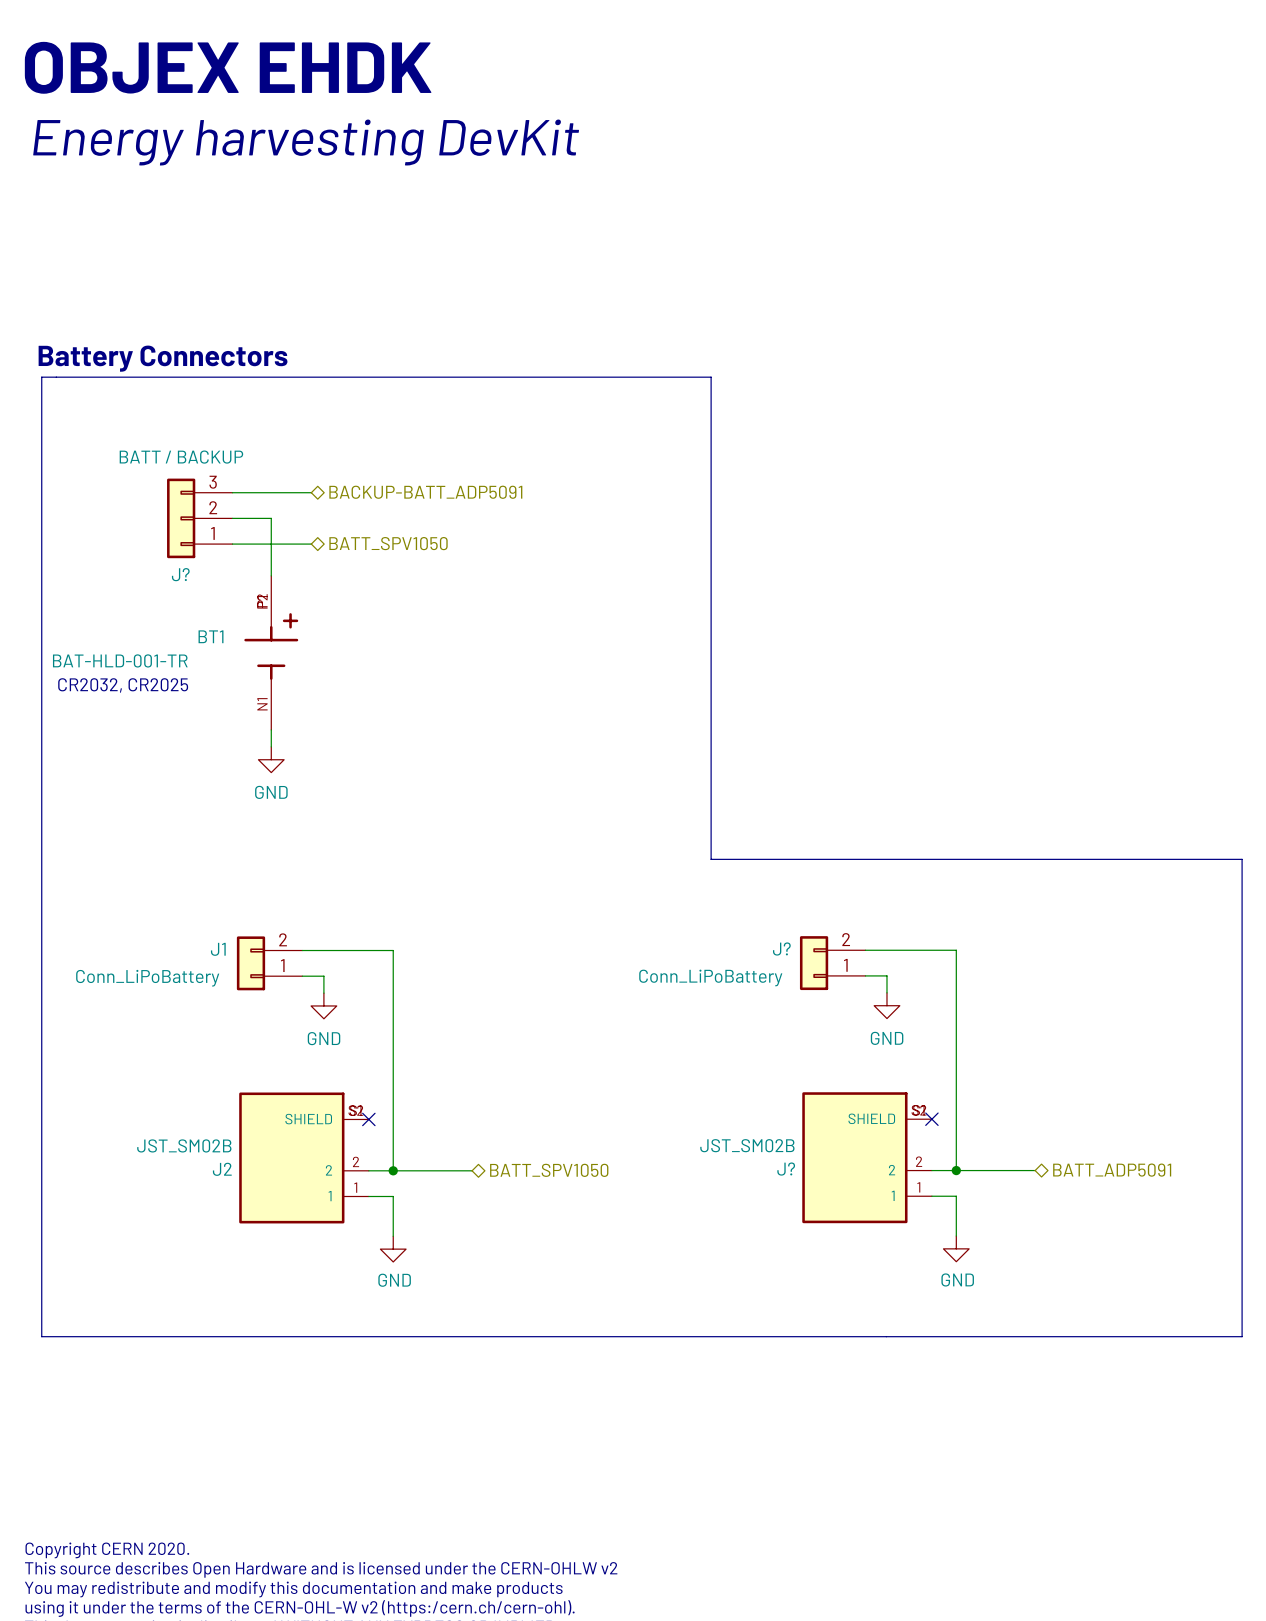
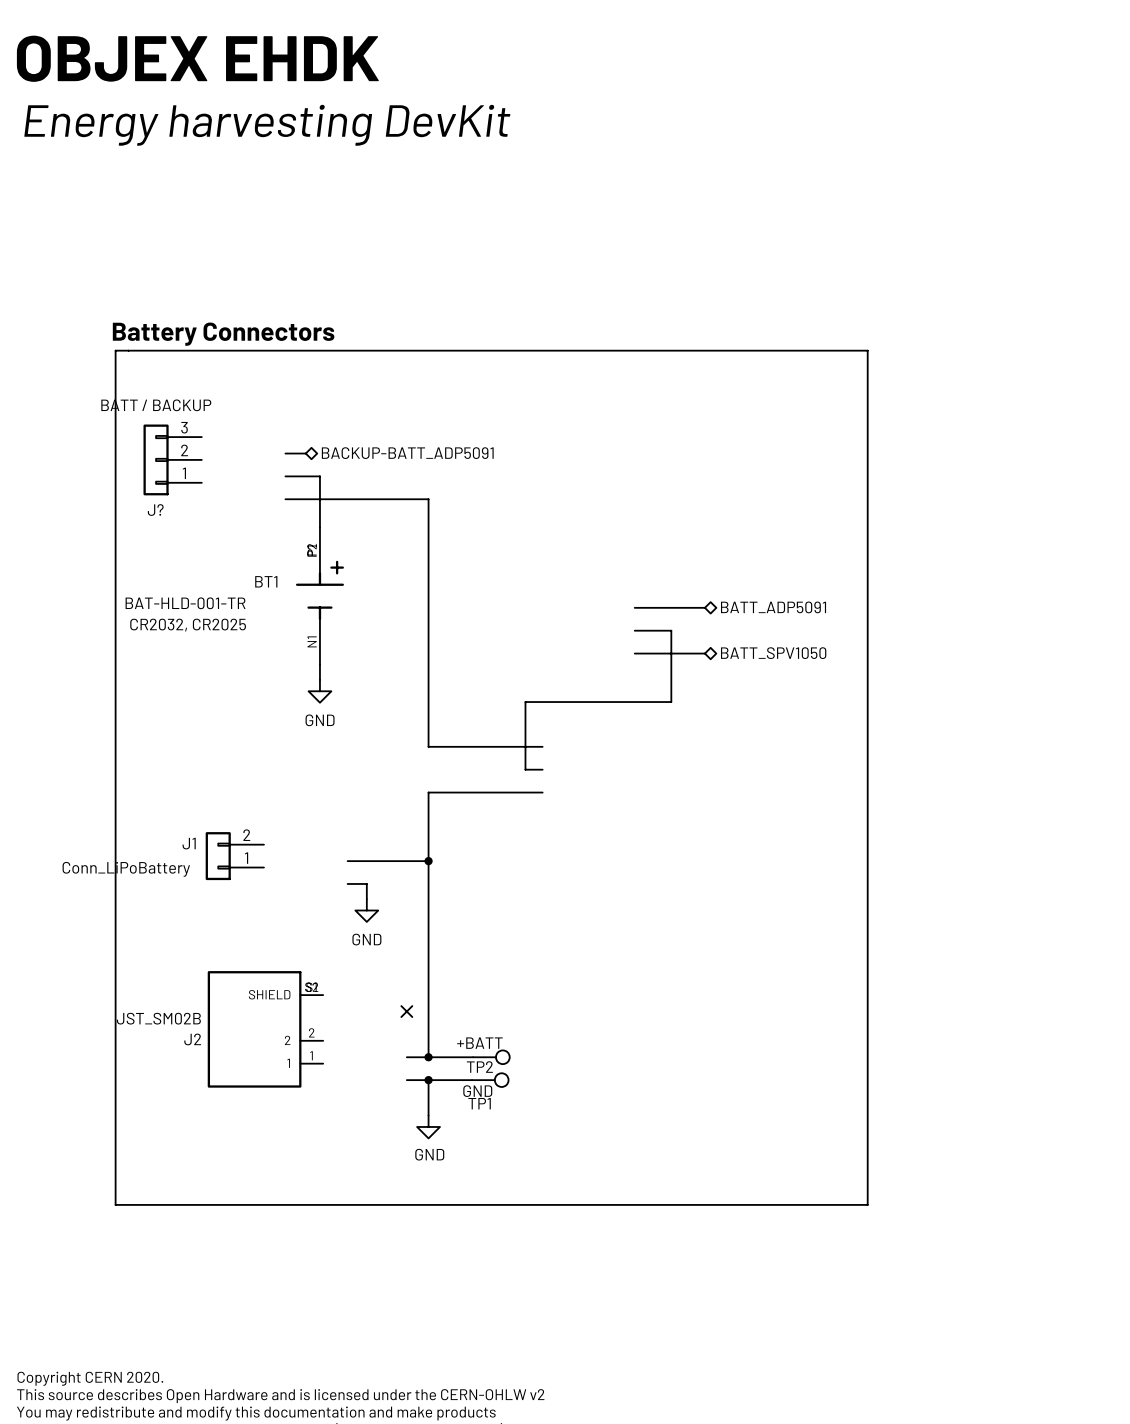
text position: Battery Connectors (163, 358) -> Battery Connectors (223, 334)
line: (41, 377) (711, 377) (711, 859) (1242, 859) (1242, 1336) (41, 1336) (41, 377) -> (115, 350) (115, 1204) (867, 1204) (867, 350) (115, 350)
wire: (232, 492) (311, 492) -> none
hierarchical label position: BACKUP-BATT_ADP5091 (425, 492) -> BACKUP-BATT_ADP5091 (407, 453)
wire: none -> (285, 453) (305, 453)
wire: (232, 518) (271, 518) (271, 575) -> (285, 476) (319, 476) (319, 527)
hierarchical label: BATT_SPV1050 (388, 543) -> none
wire: (232, 544) (311, 544) -> none
wire: none -> (285, 499) (428, 499) (428, 746) (542, 746)
BT1 position: (271, 652) -> (319, 596)
wire: none -> (634, 607) (704, 607)
hierarchical label: none -> BATT_ADP5091 (773, 607)
text position: CR2032, CR2025 (123, 685) -> CR2032, CR2025 (188, 625)
wire: none -> (634, 630) (671, 630) (671, 702) (525, 702) (525, 769) (542, 769)
wire: (271, 729) (271, 746) -> (319, 664) (319, 679)
wire: none -> (634, 653) (704, 653)
hierarchical label: none -> BATT_SPV1050 (773, 653)
power symbol position: GND (271, 759) -> GND (319, 691)
wire: none -> (542, 792) (428, 792) (428, 1057)
wire: (302, 950) (393, 950) (393, 1170) -> none
wire: (865, 950) (956, 950) (956, 1170) -> none
J?: Conn_LiPoBattery (832, 963) -> none
wire: none -> (347, 861) (428, 861)
junction: none -> (428, 861)
wire: (865, 975) (886, 975) (886, 992) -> none
wire: (302, 976) (323, 976) (323, 993) -> (347, 883) (366, 883) (366, 899)
power symbol position: GND (323, 1005) -> GND (366, 910)
power symbol: GND (886, 1005) -> none
no-connect mark: (368, 1119) -> none
no-connect mark: (931, 1119) -> none
no-connect mark: none -> (406, 1011)
J?: JST_SM02B (867, 1157) -> none
wire: (368, 1170) (472, 1170) -> none
junction: (393, 1170) -> none
hierarchical label: BATT_SPV1050 (549, 1170) -> none
wire: (931, 1170) (1035, 1170) -> none
junction: (956, 1170) -> none
hierarchical label: BATT_ADP5091 (1112, 1170) -> none
wire: none -> (406, 1057) (473, 1057)
junction: none -> (428, 1057)
TP2: none -> +BATT (491, 1057)
wire: (368, 1196) (393, 1196) (393, 1236) -> none
wire: (931, 1196) (956, 1196) (956, 1236) -> none
wire: none -> (406, 1080) (471, 1080)
wire: none -> (428, 1080) (428, 1115)
junction: none -> (428, 1080)
TP1: none -> GND (490, 1080)
power symbol: GND (956, 1248) -> none
power symbol position: GND (393, 1249) -> GND (428, 1126)

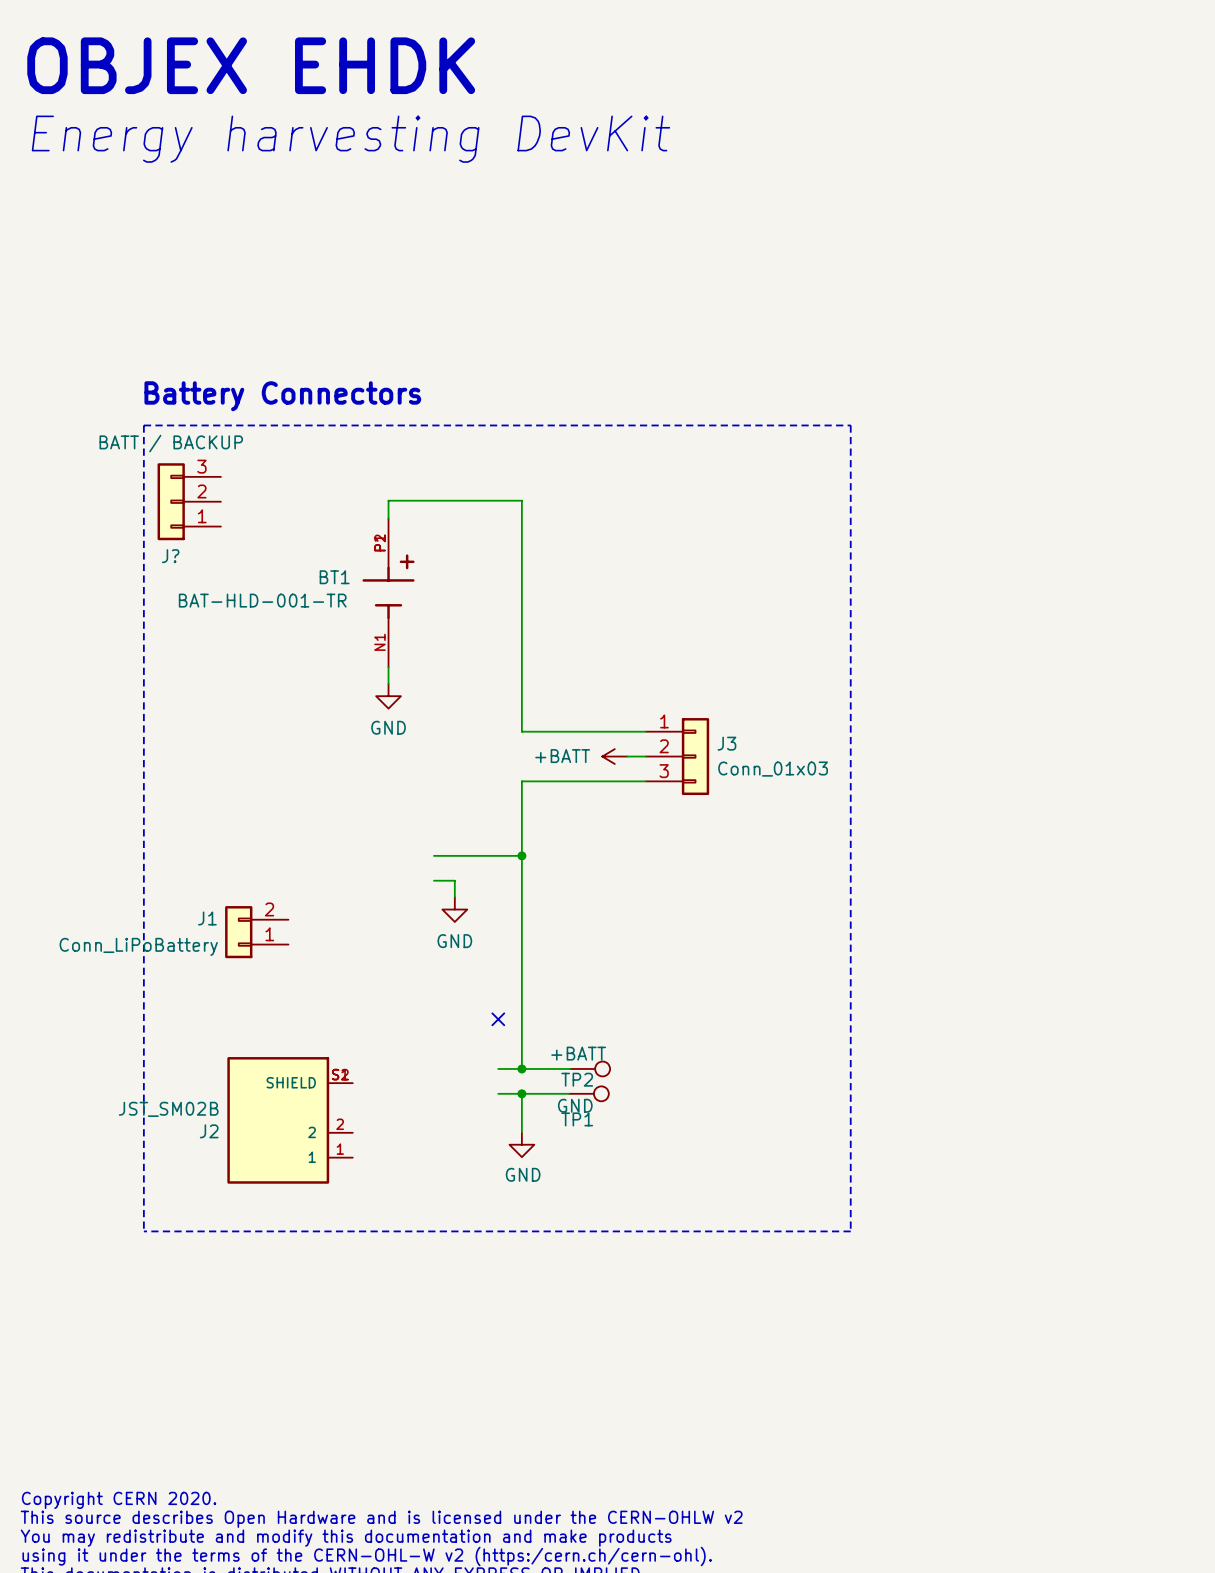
text position: Battery Connectors (223, 334) -> Battery Connectors (282, 396)
line: (115, 350) (867, 350) (867, 1204) (115, 1204) (115, 350) -> (143, 425) (143, 1231) (850, 1231) (850, 425) (143, 425)
wire: (285, 453) (305, 453) -> none
hierarchical label: BACKUP-BATT_ADP5091 (407, 453) -> none
wire: none -> (388, 518) (388, 500) (521, 500) (521, 731) (645, 731)
wire: (285, 476) (319, 476) (319, 527) -> none
wire: (285, 499) (428, 499) (428, 746) (542, 746) -> none
BT1 position: (319, 596) -> (388, 592)
wire: (634, 607) (704, 607) -> none
hierarchical label: BATT_ADP5091 (773, 607) -> none
text: CR2032, CR2025 (188, 625) -> none
wire: (634, 630) (671, 630) (671, 702) (525, 702) (525, 769) (542, 769) -> none
wire: (634, 653) (704, 653) -> none
hierarchical label: BATT_SPV1050 (773, 653) -> none
wire: (319, 664) (319, 679) -> (388, 667) (388, 683)
power symbol position: GND (319, 691) -> GND (388, 696)
power symbol: none -> +BATT (614, 756)
wire: none -> (627, 756) (645, 756)
J3: none -> Conn_01x03 (677, 756)
junction: none -> (521, 855)
wire: (542, 792) (428, 792) (428, 1057) -> (645, 781) (521, 781) (521, 1068)
power symbol: none -> GND (454, 909)
wire: (347, 861) (428, 861) -> (433, 855) (521, 855)
junction: (428, 861) -> none
wire: (347, 883) (366, 883) (366, 899) -> (433, 880) (454, 880) (454, 897)
power symbol: GND (366, 910) -> none
no-connect mark: none -> (498, 1019)
junction: none -> (521, 1068)
junction: none -> (521, 1093)
no-connect mark: (406, 1011) -> none
power symbol: none -> GND (521, 1144)
wire: (406, 1057) (473, 1057) -> (498, 1068) (570, 1068)
junction: (428, 1057) -> none
TP2 position: (491, 1057) -> (590, 1068)
wire: (406, 1080) (471, 1080) -> (498, 1093) (569, 1093)
wire: (428, 1080) (428, 1115) -> (521, 1093) (521, 1132)
junction: (428, 1080) -> none
TP1 position: (490, 1080) -> (588, 1093)
power symbol: GND (428, 1126) -> none

